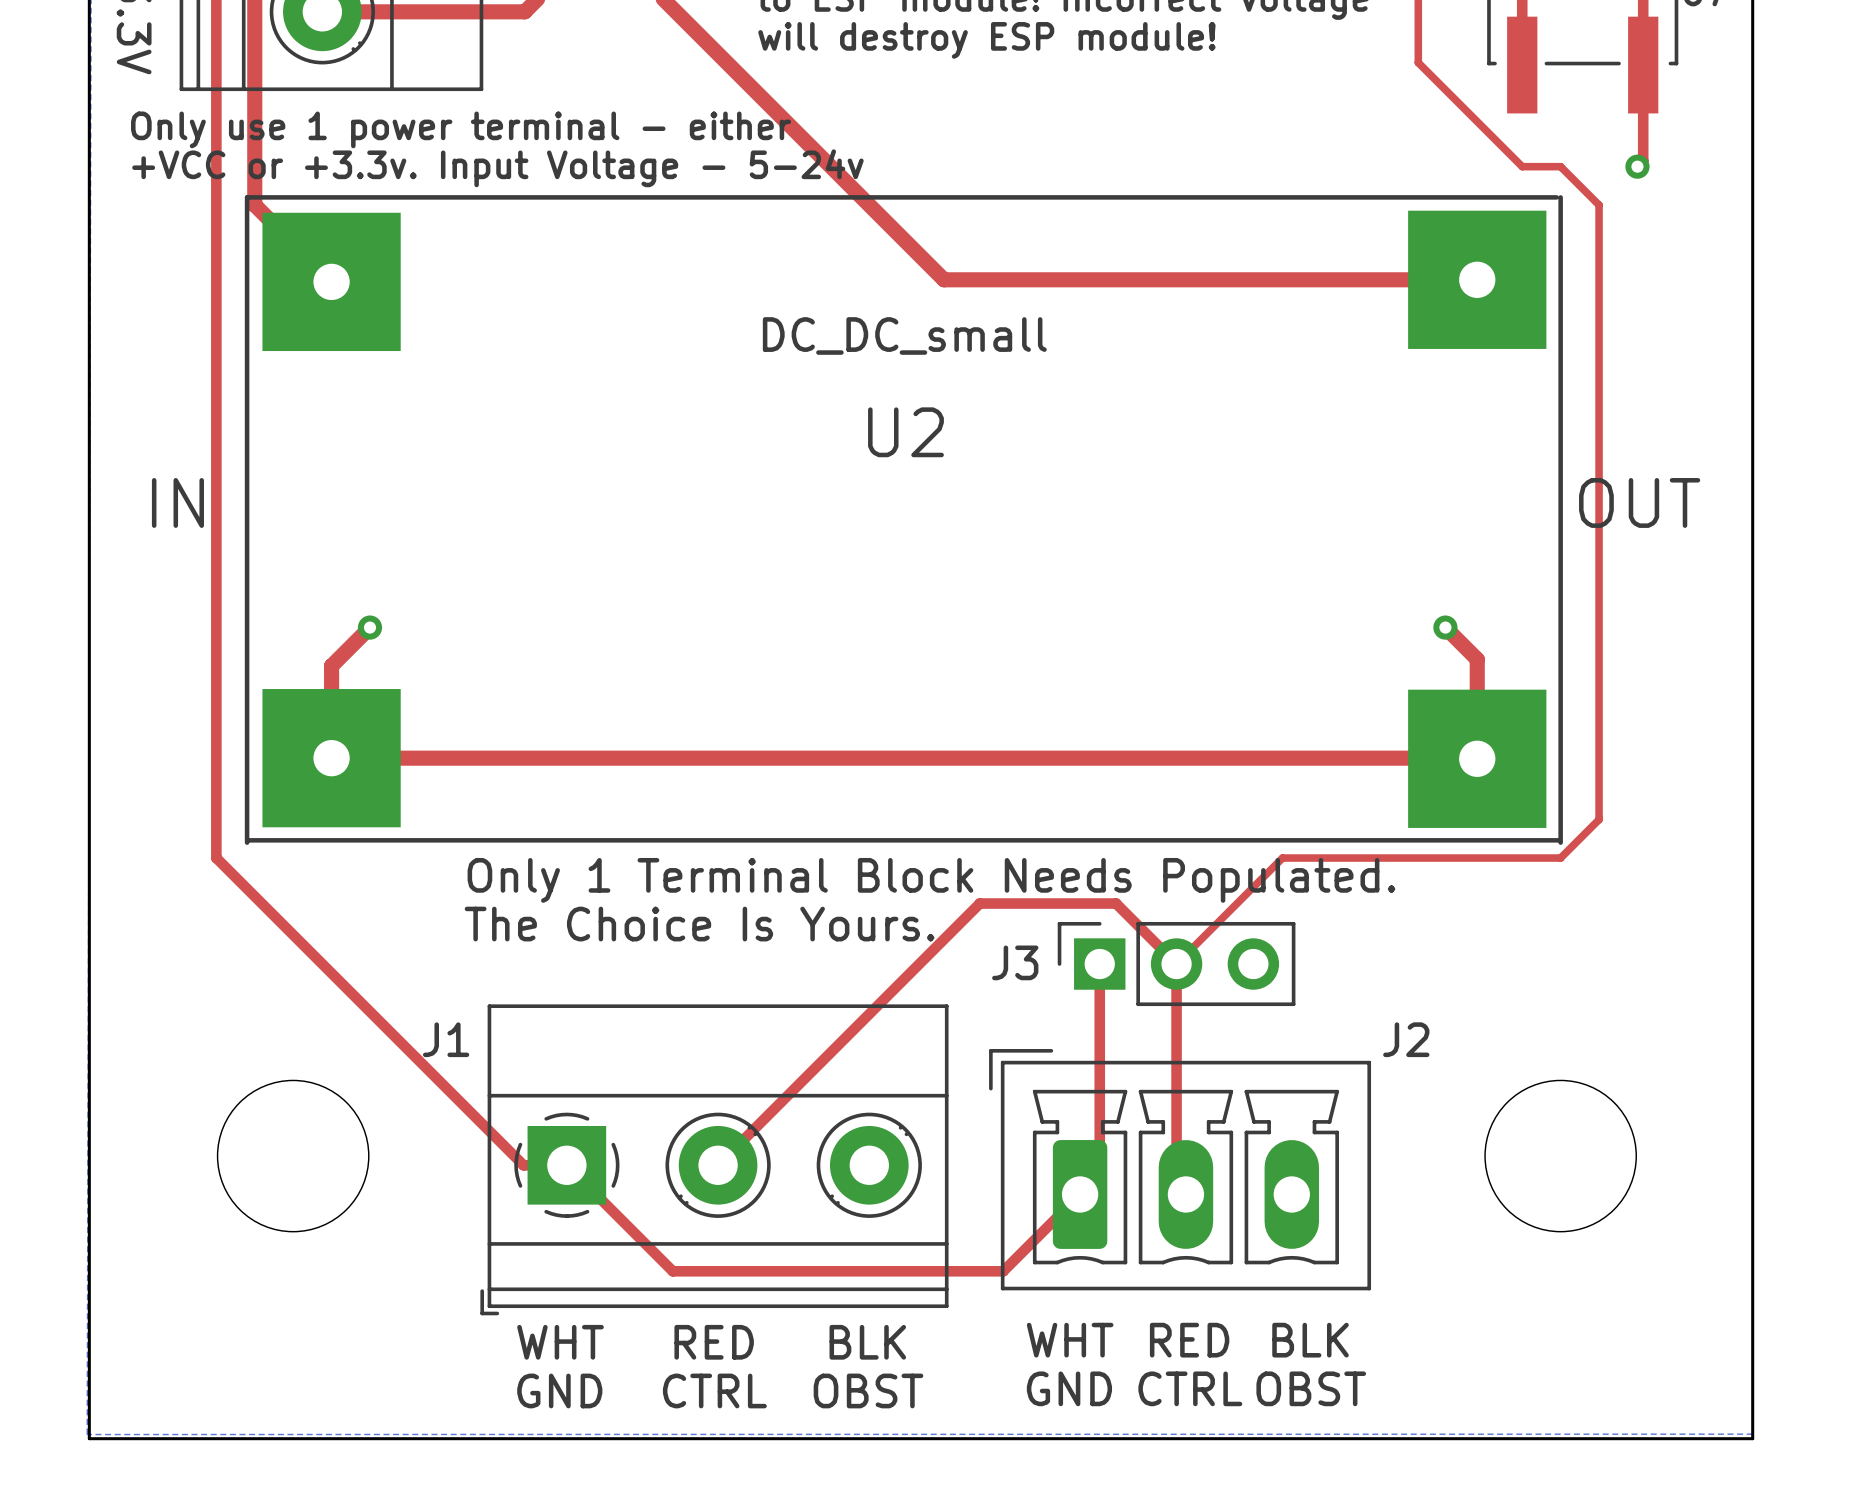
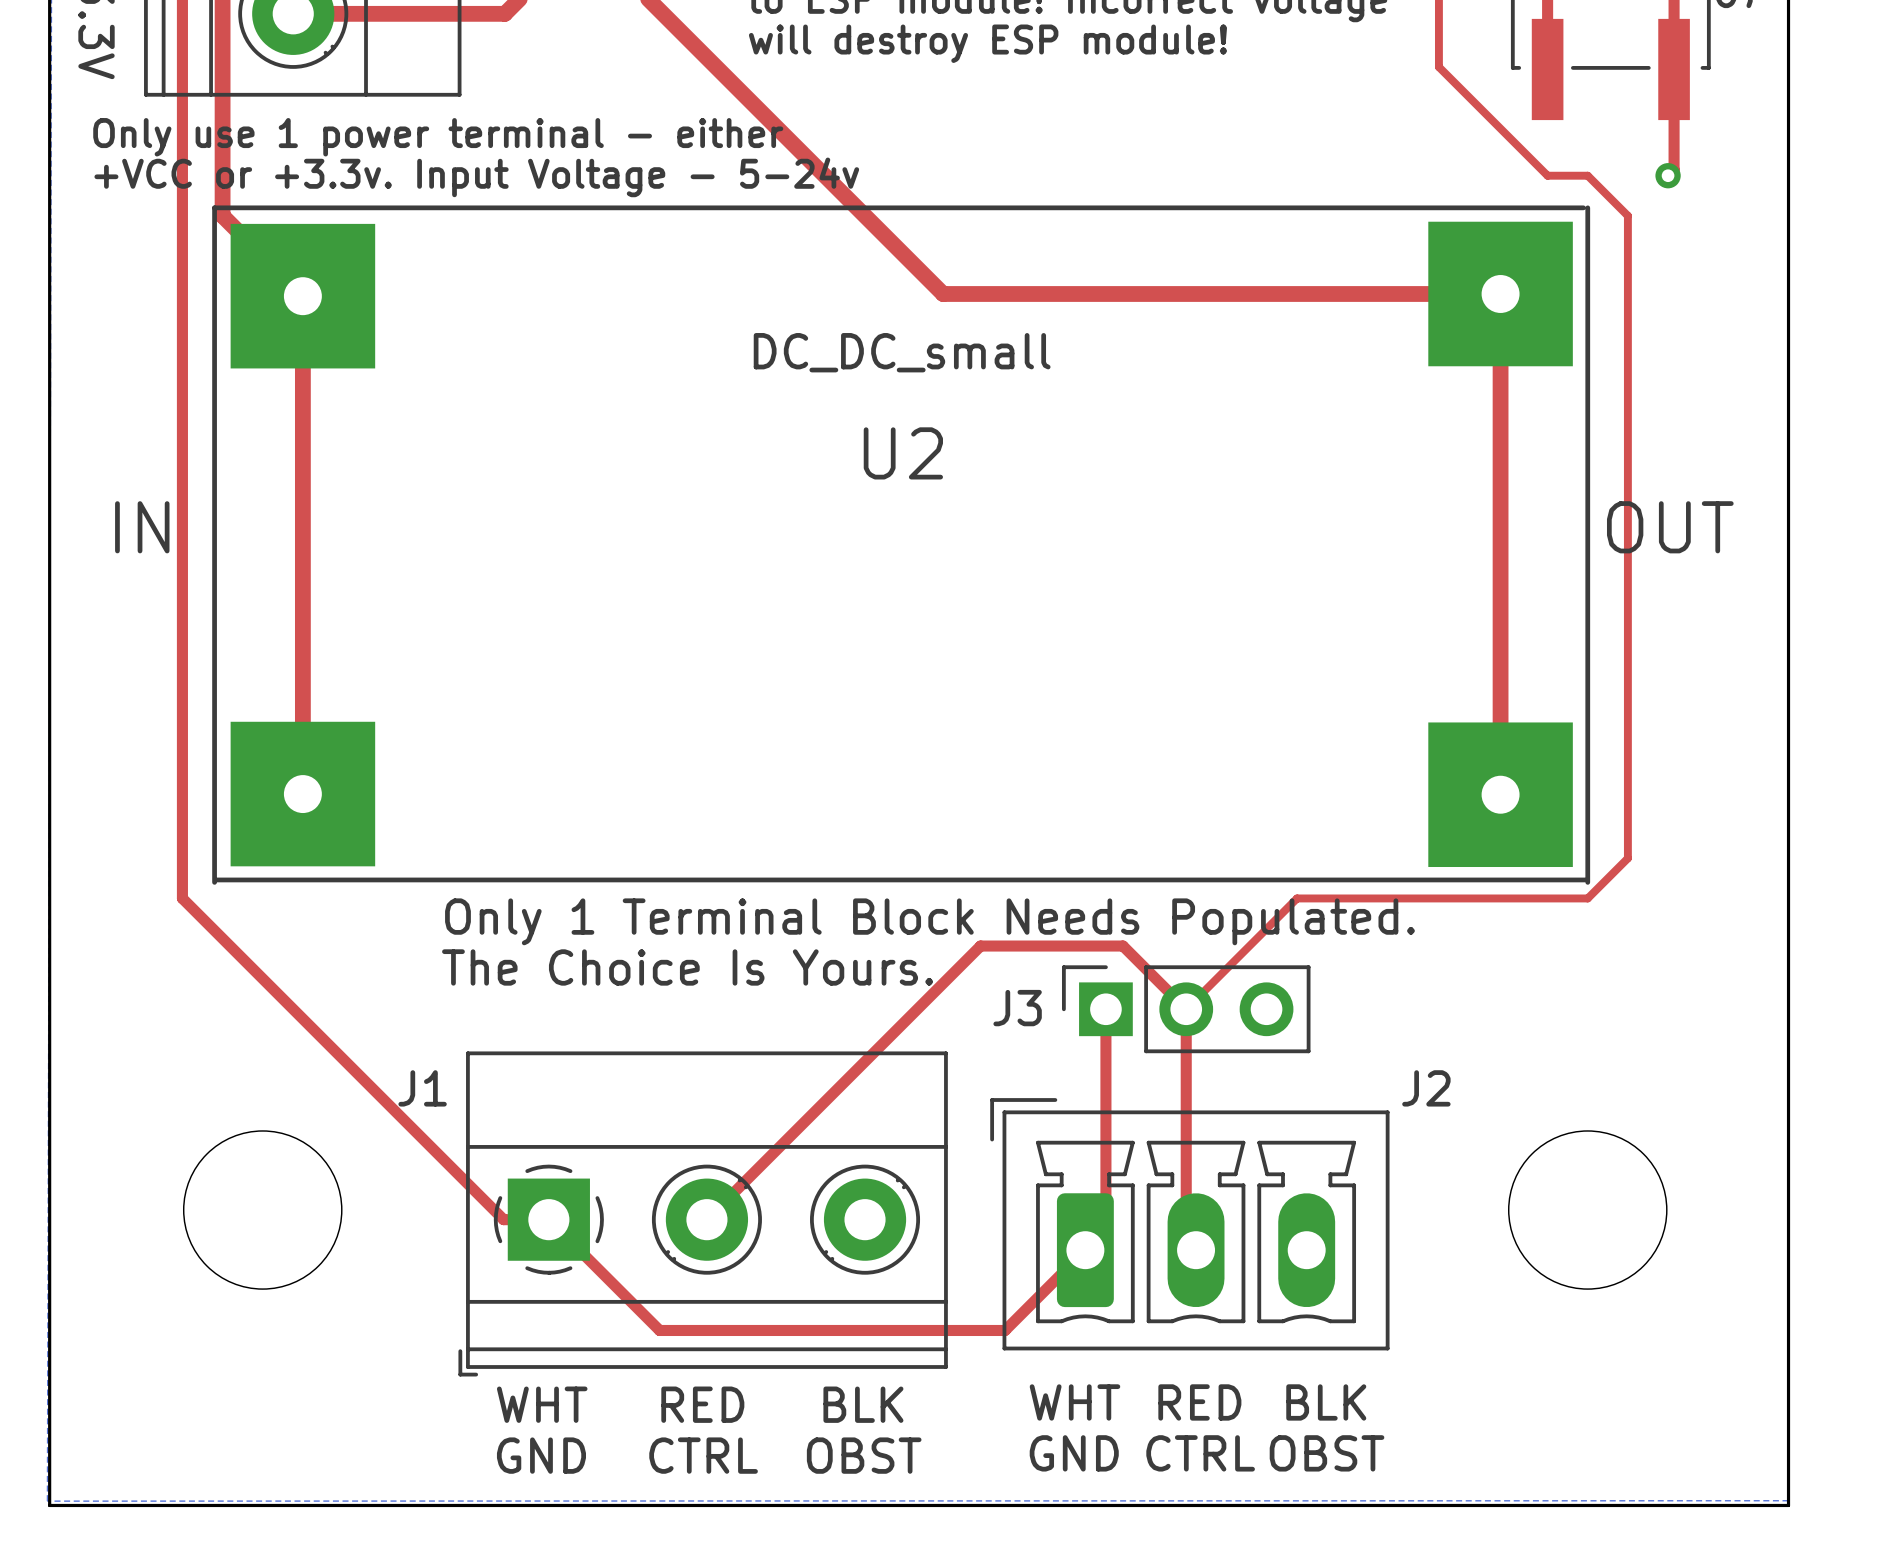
top track: (369, 627) (331, 665) -> (302, 296) (302, 697)
via: (369, 627) -> none
top track: (1445, 627) (1477, 659) -> (1500, 293) (1500, 690)
via: (1445, 627) -> none
top track: (331, 758) (1477, 758) -> none

